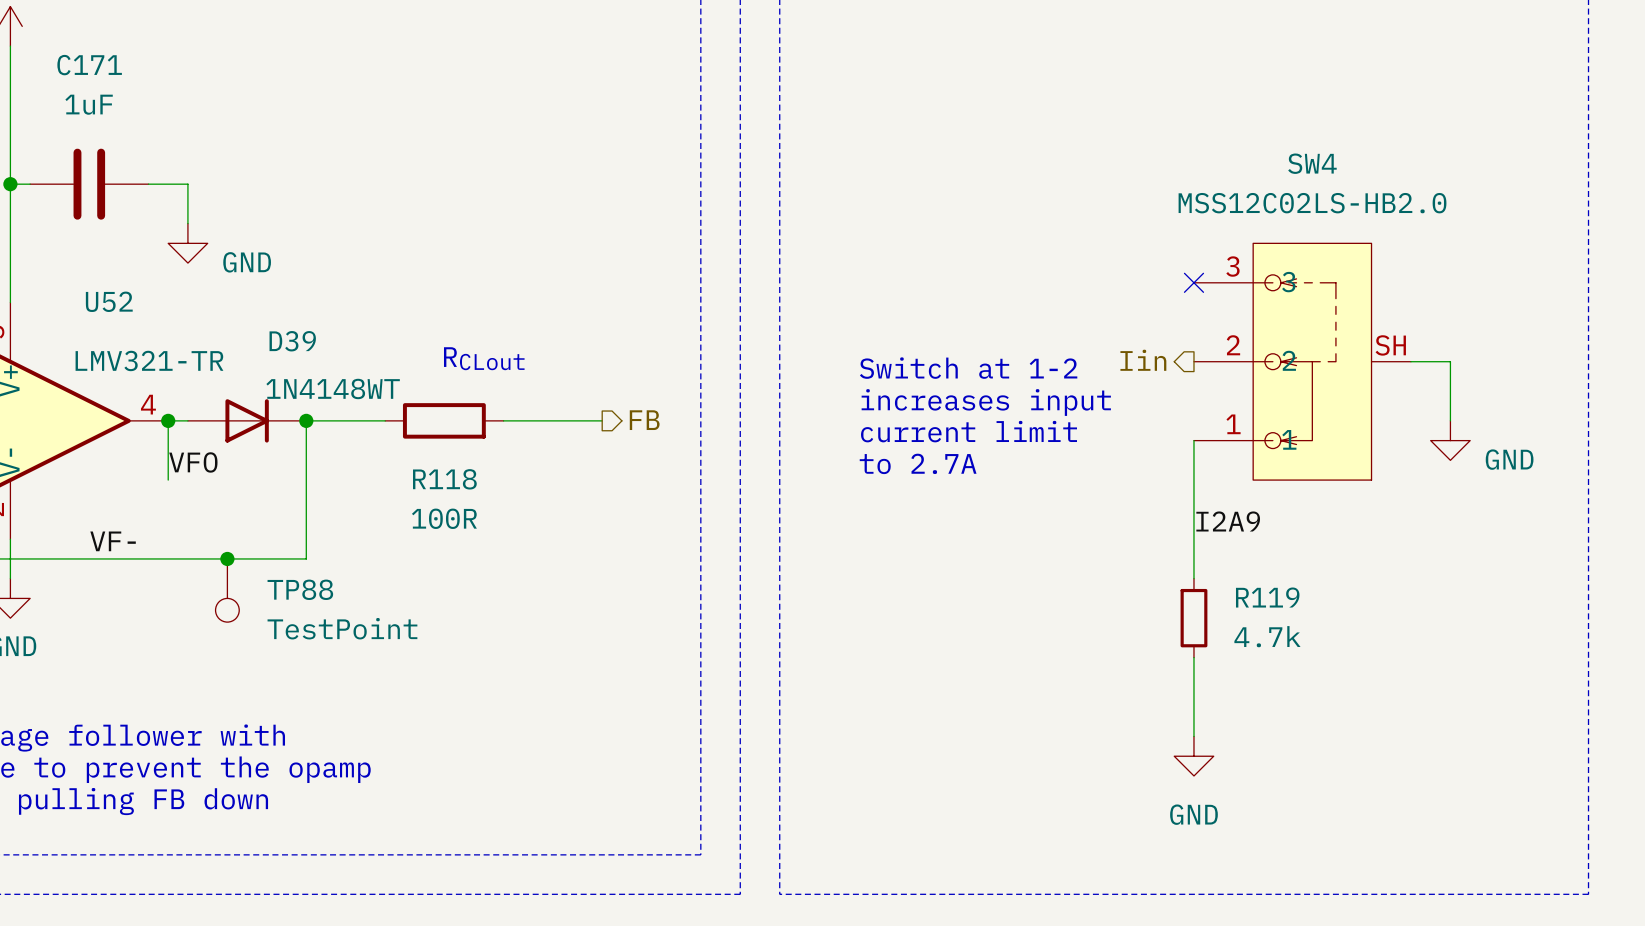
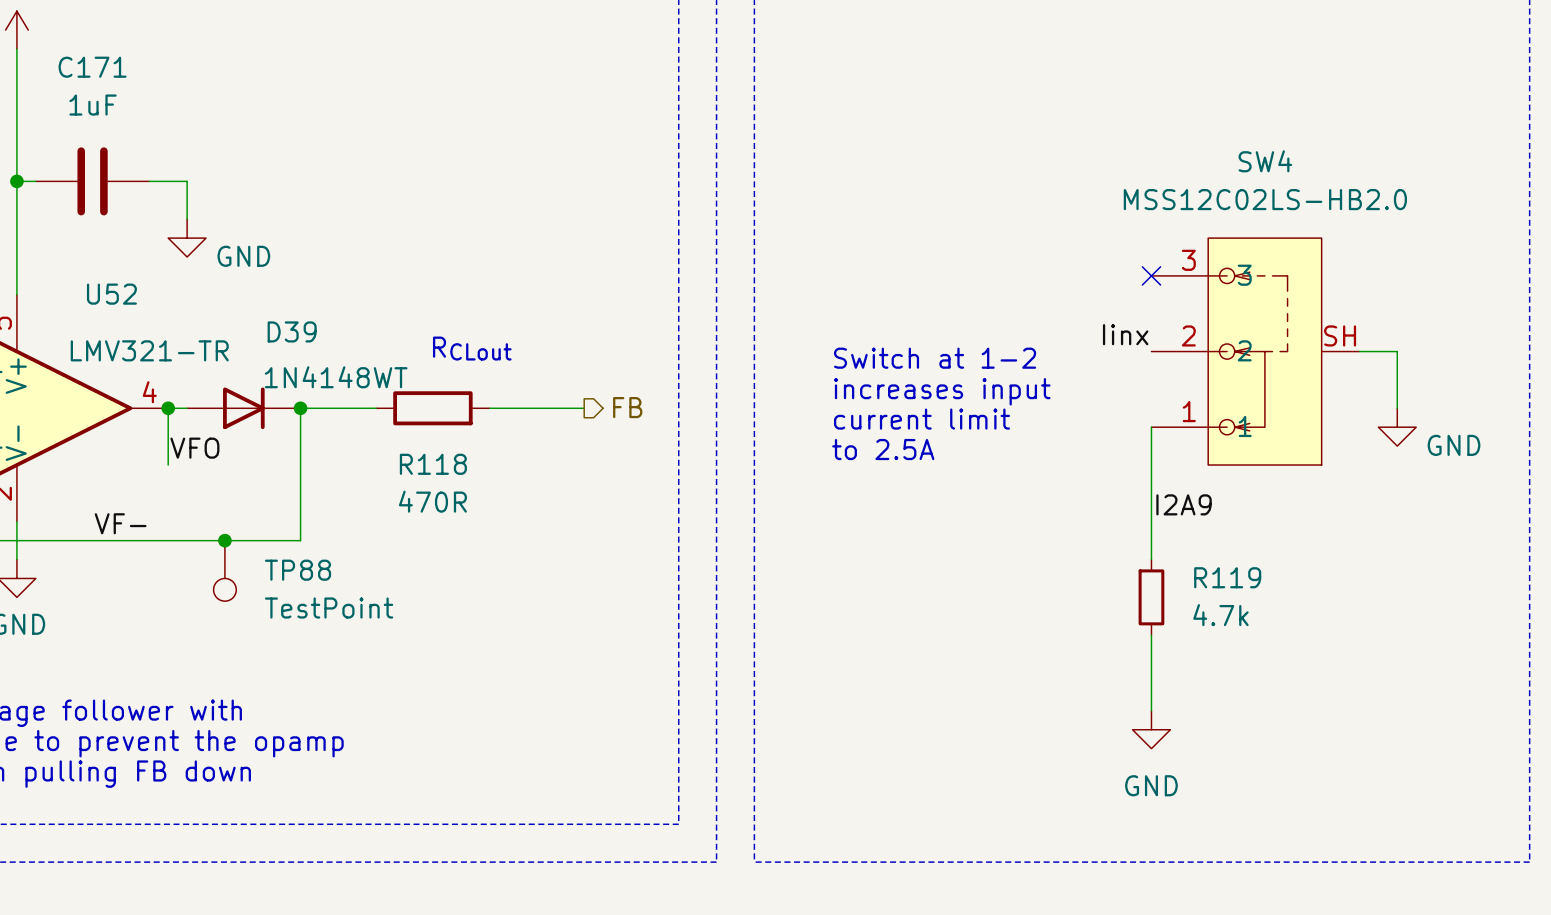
label: none -> Iinx (1125, 334)
hierarchical label: Iin (1143, 360) -> none
text: to 2.7A (918, 463) -> to 2.5A (883, 449)
R118 value: 100R (444, 518) -> 470R (432, 501)

